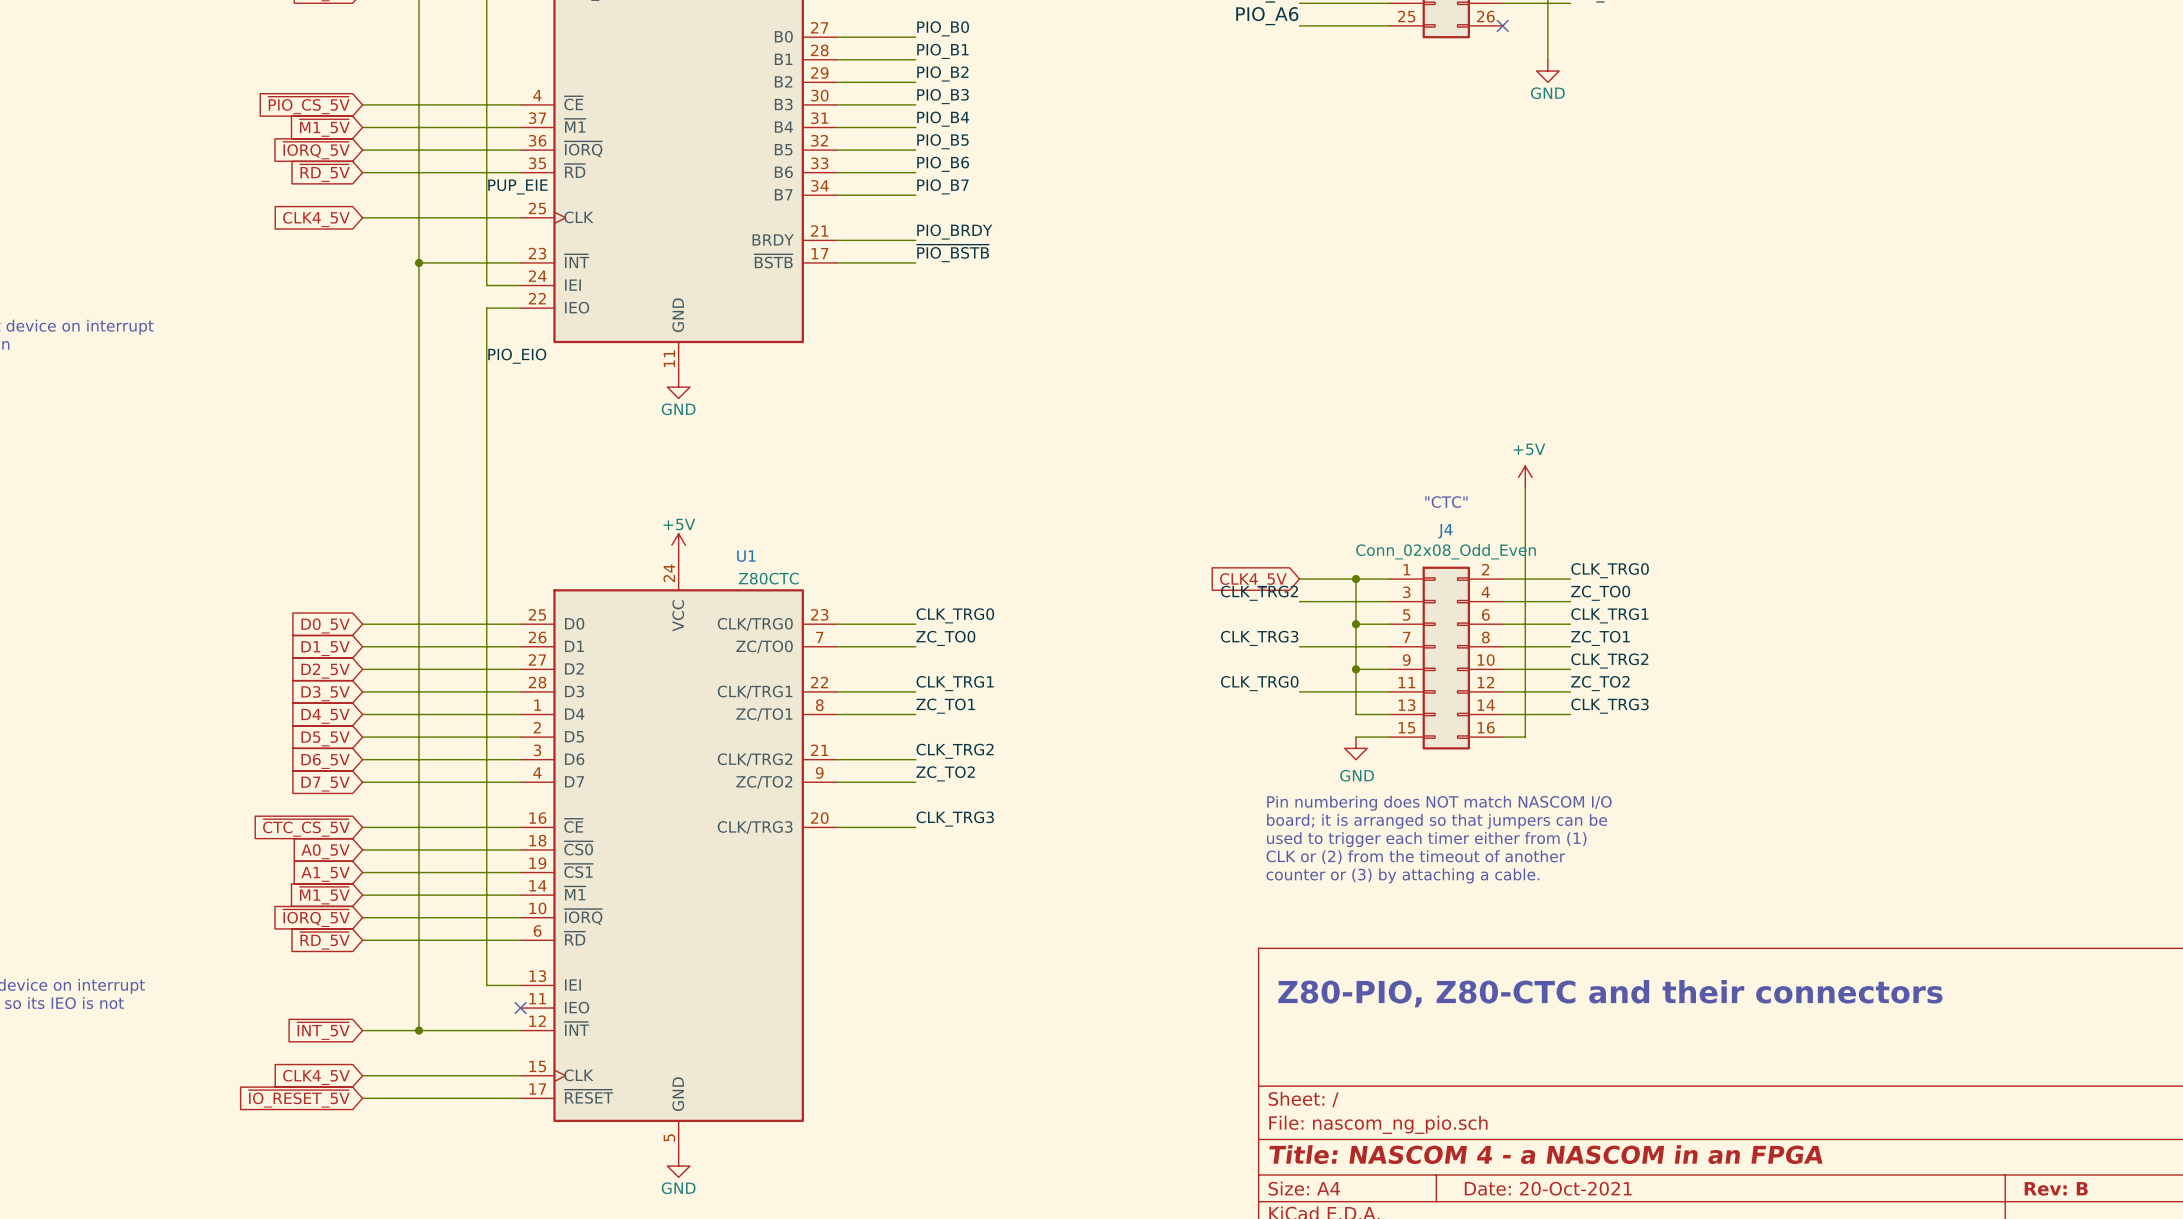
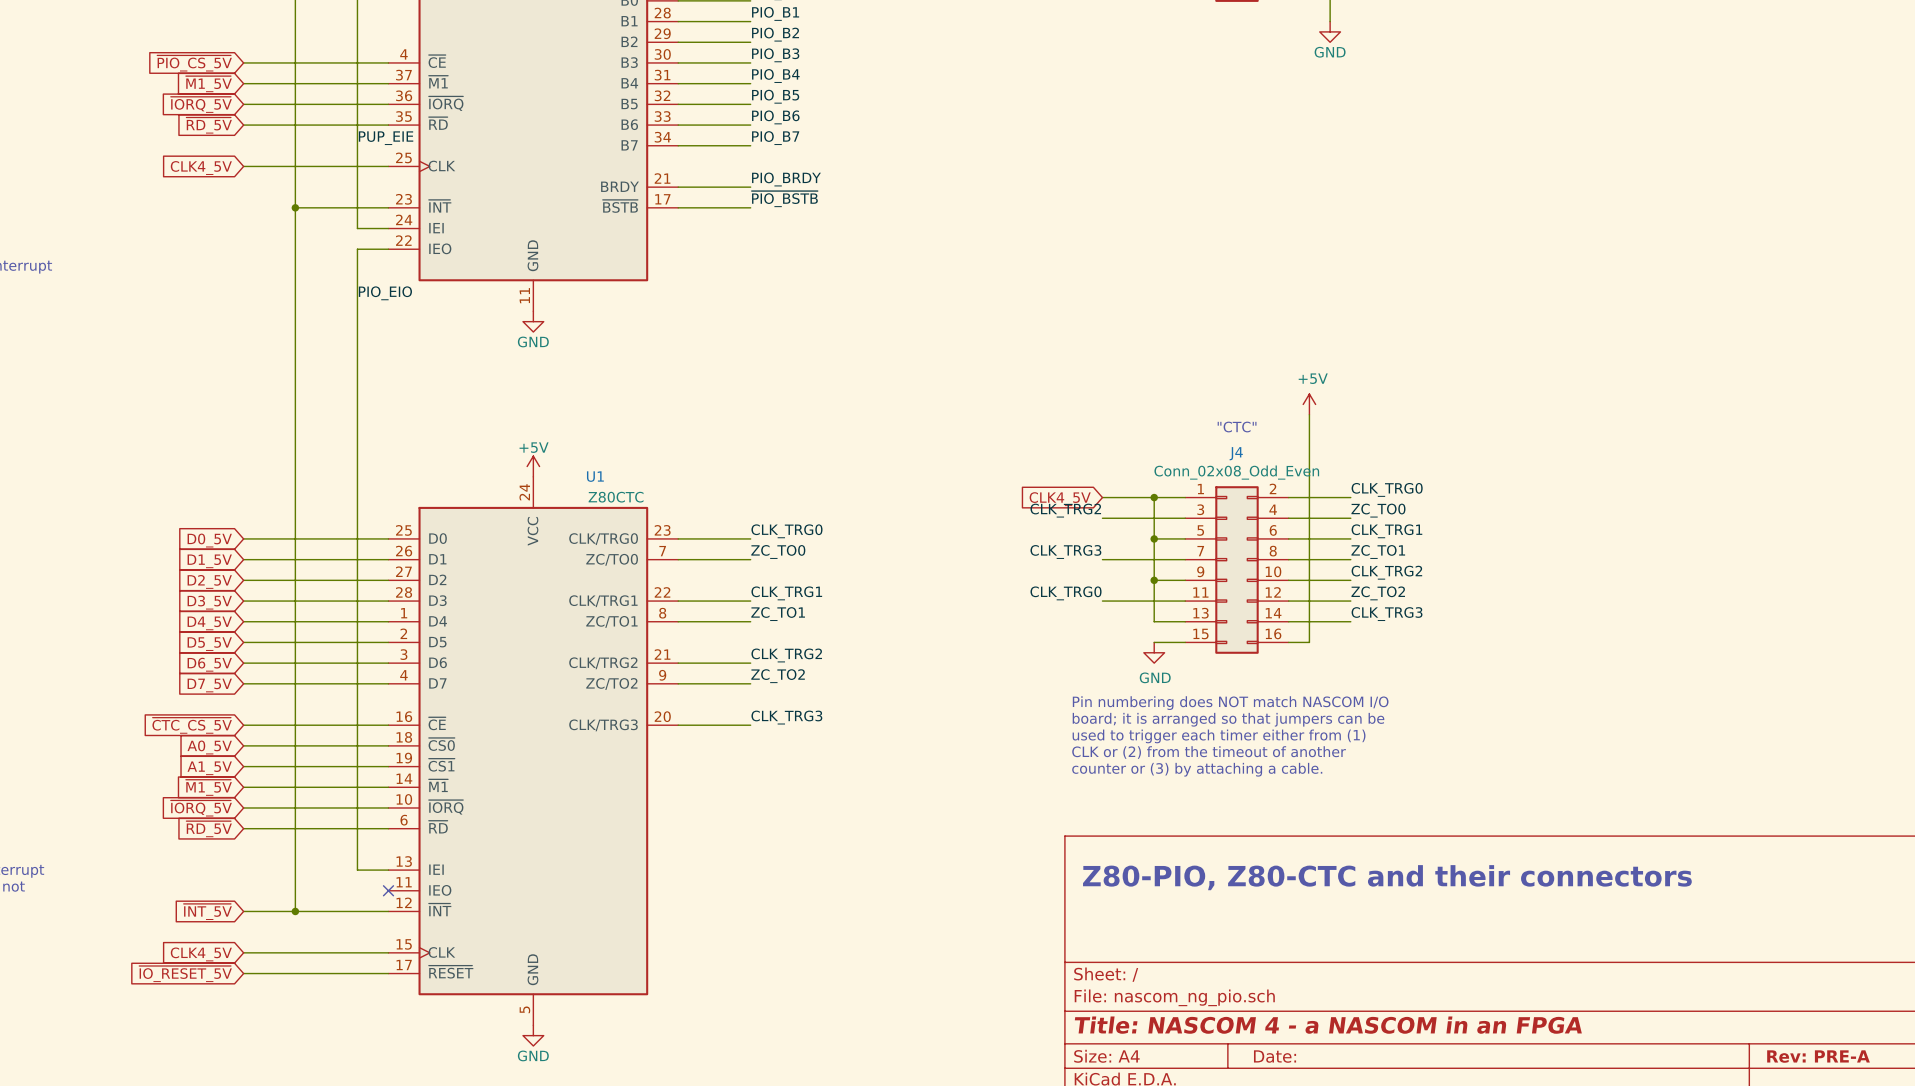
title block: Date: 20-Oct-2021 (1548, 1188) -> Date: (1275, 1056)
title block: Rev: B (2056, 1188) -> Rev: PRE-A (1818, 1056)

